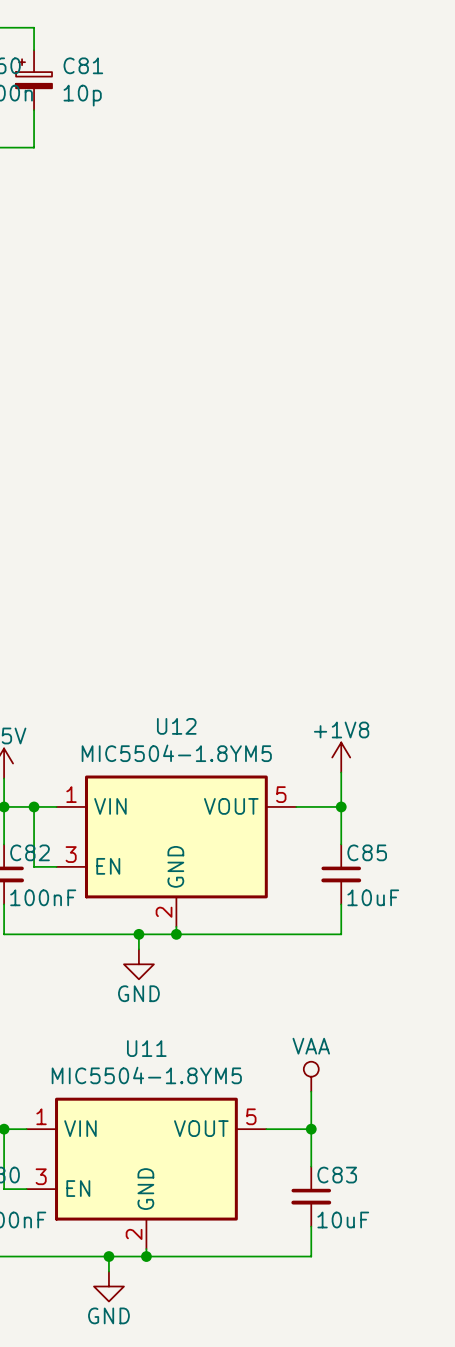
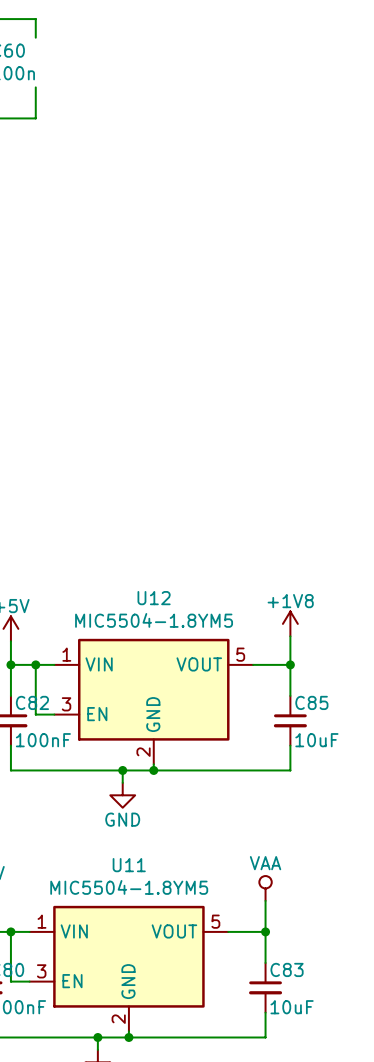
C81: 10p (34, 80) -> none

